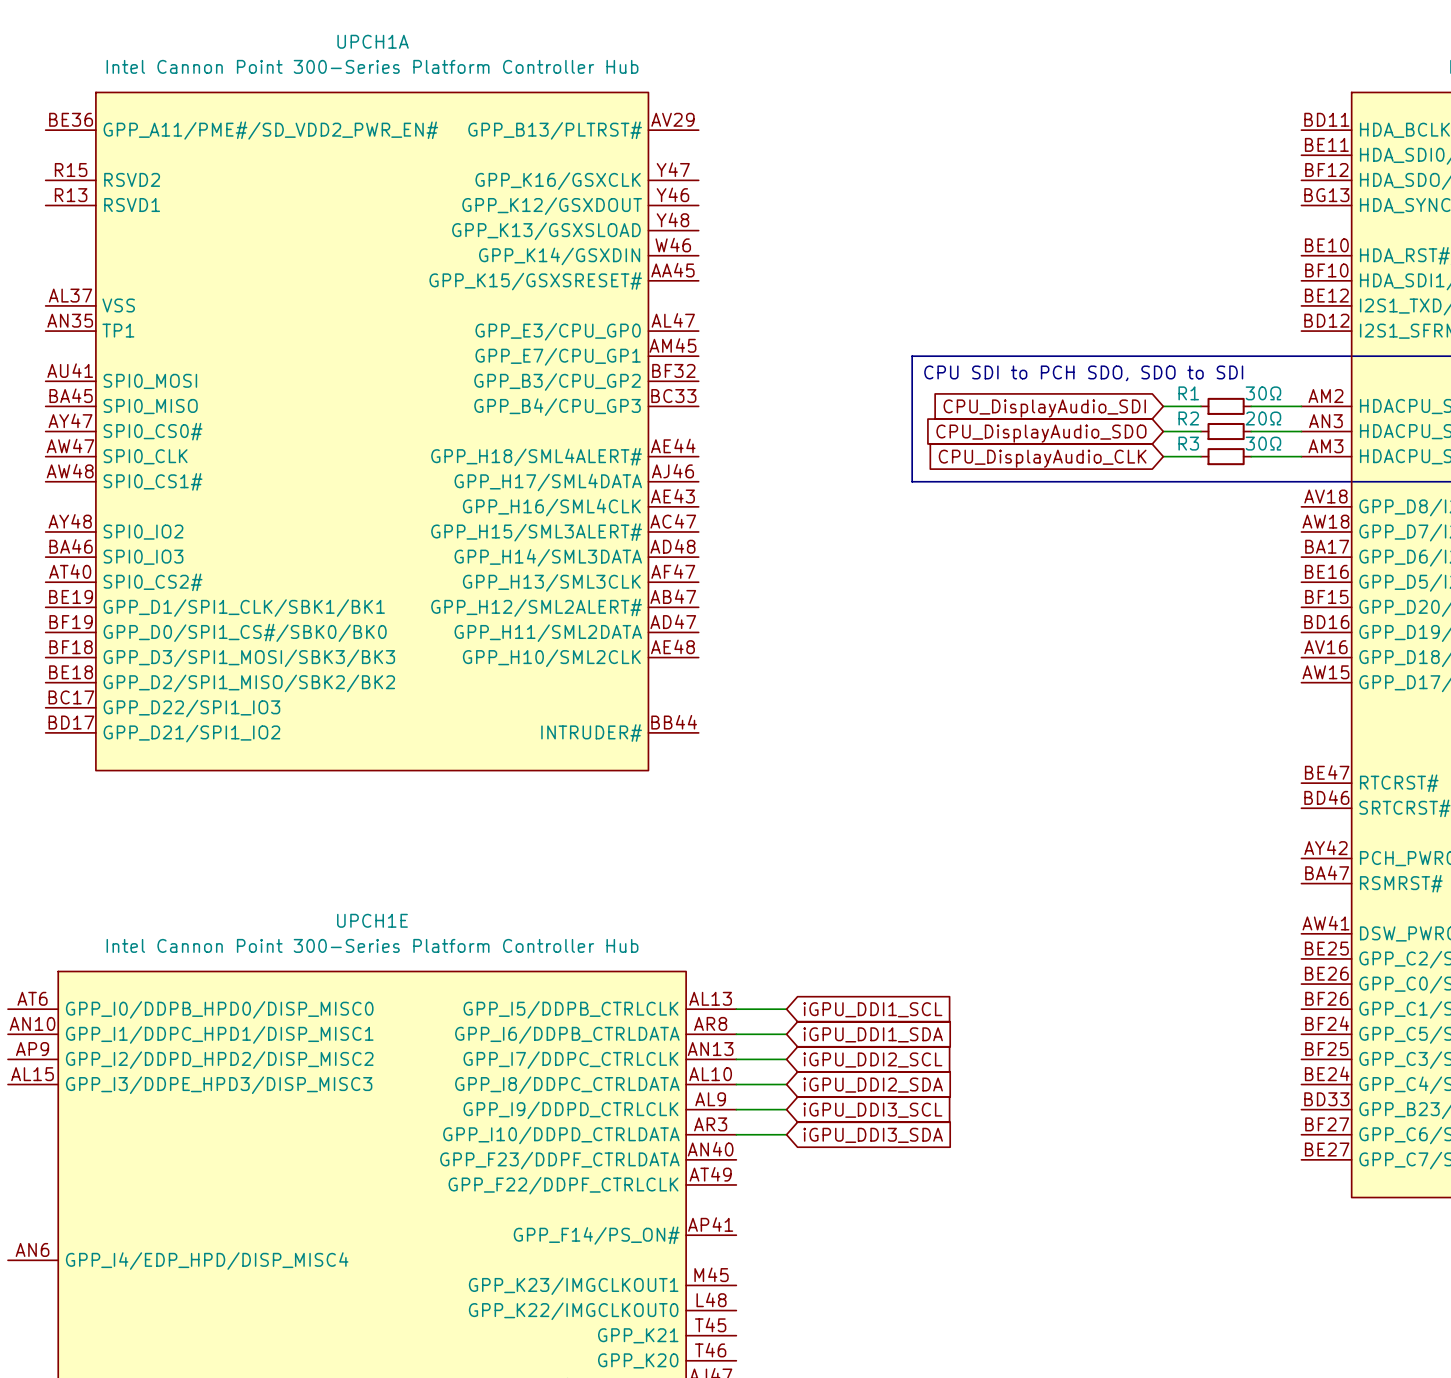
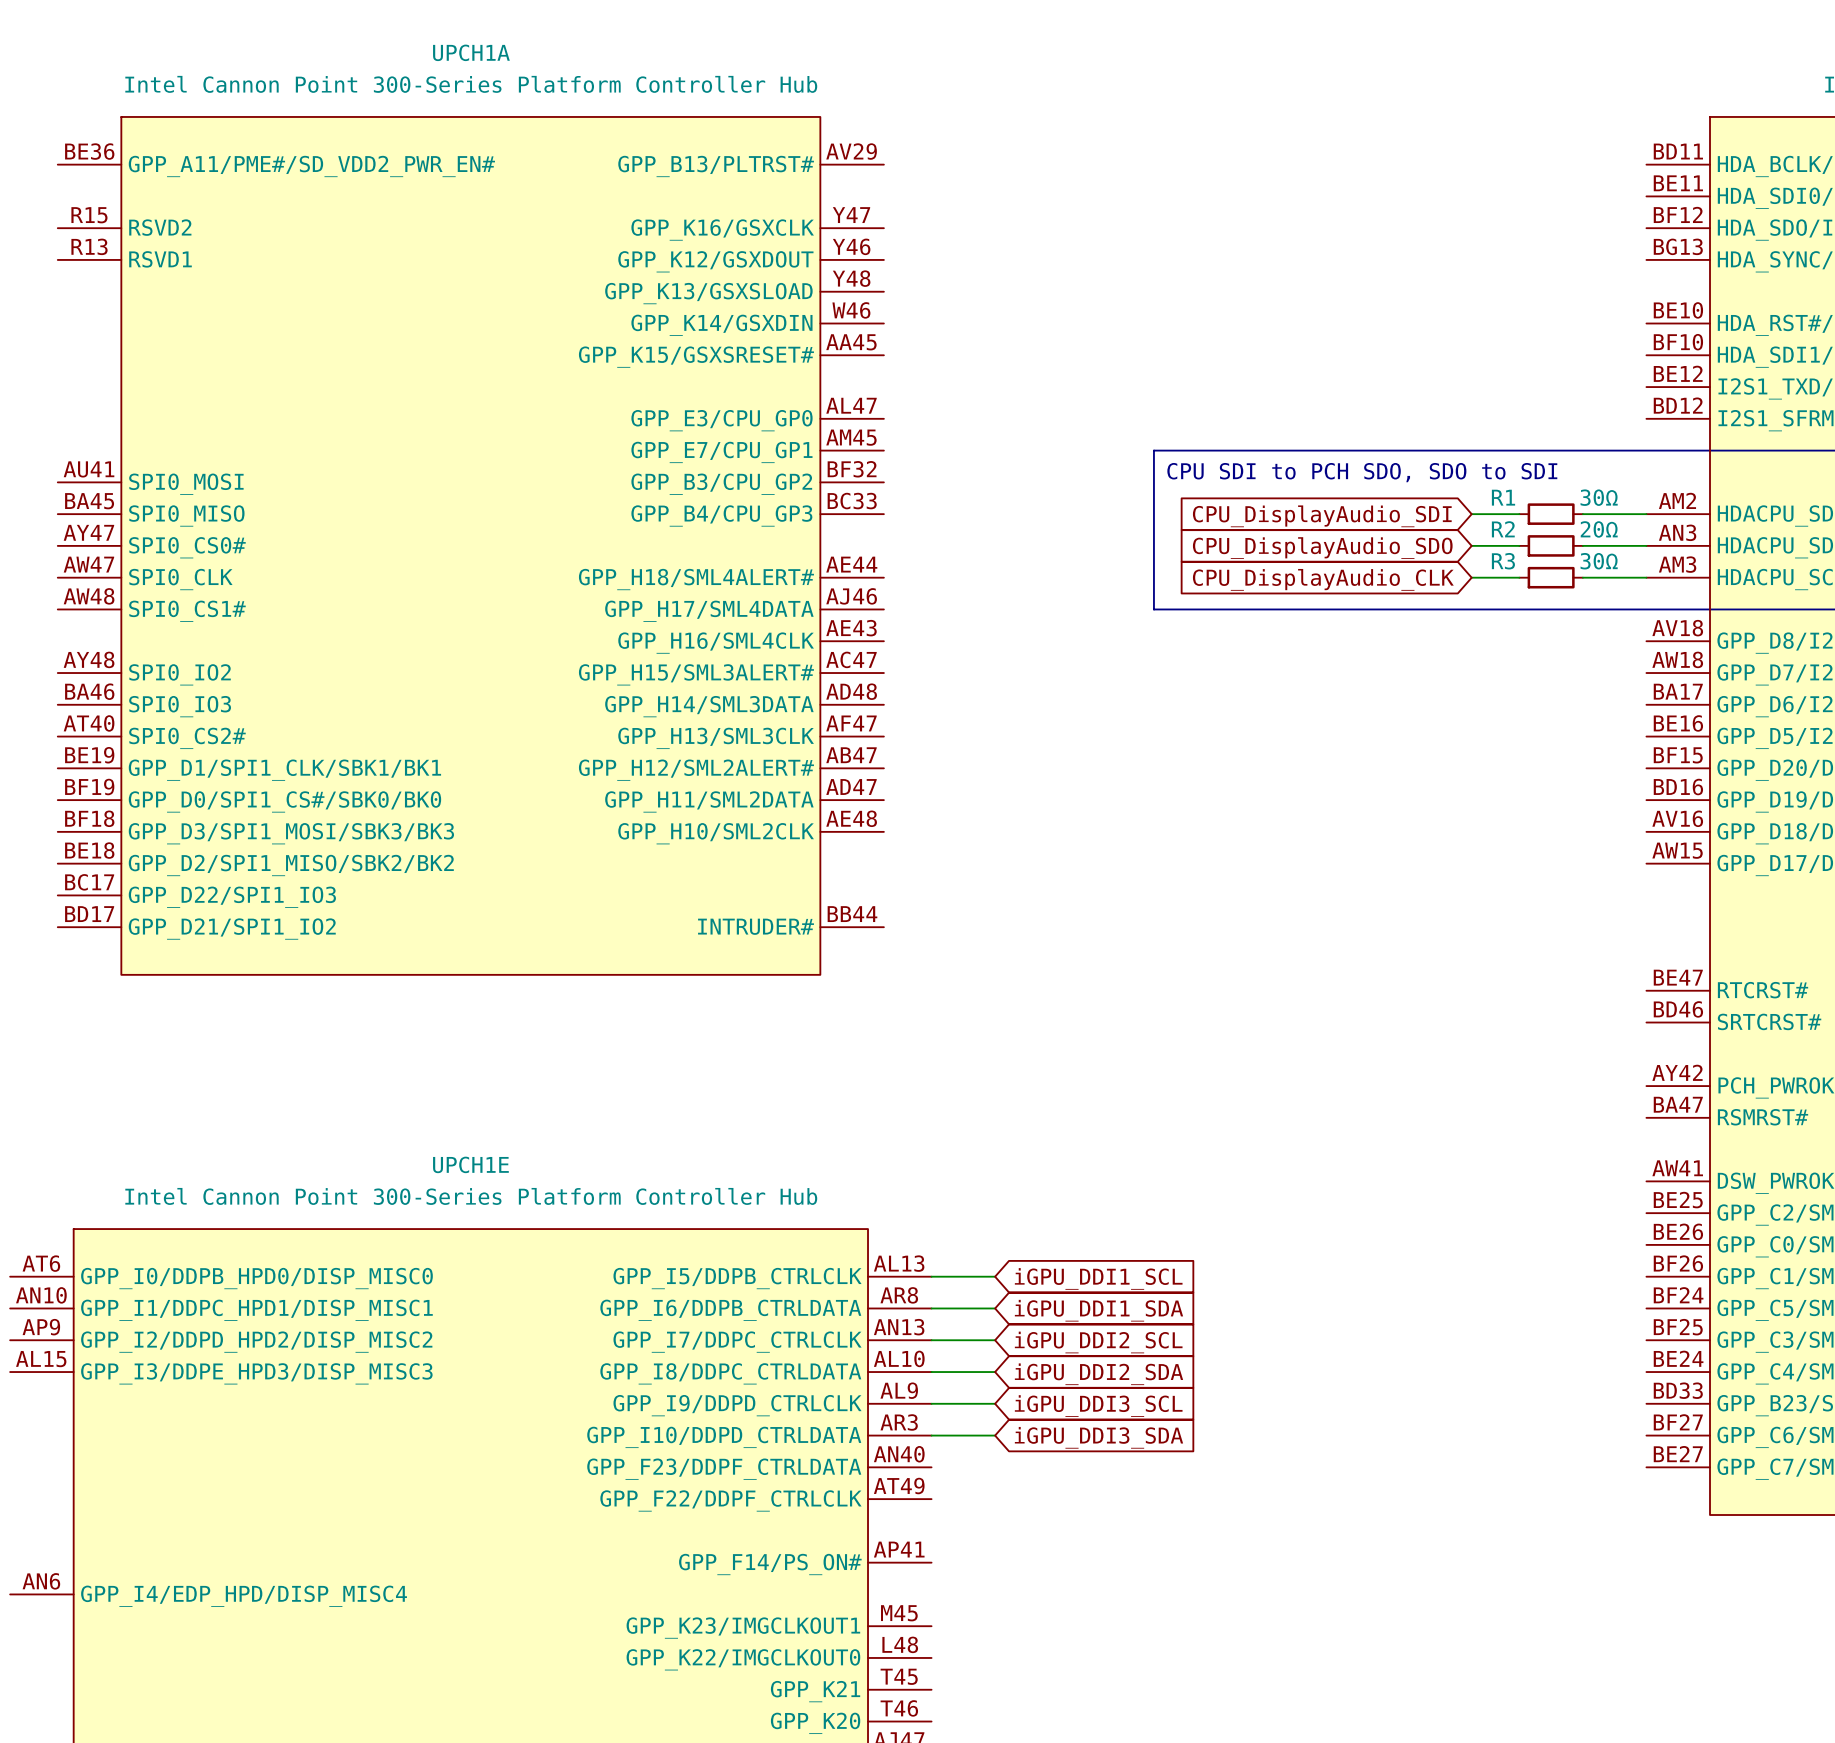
UPCH1A symbol: [45, 92, 699, 771] -> [57, 116, 884, 975]

